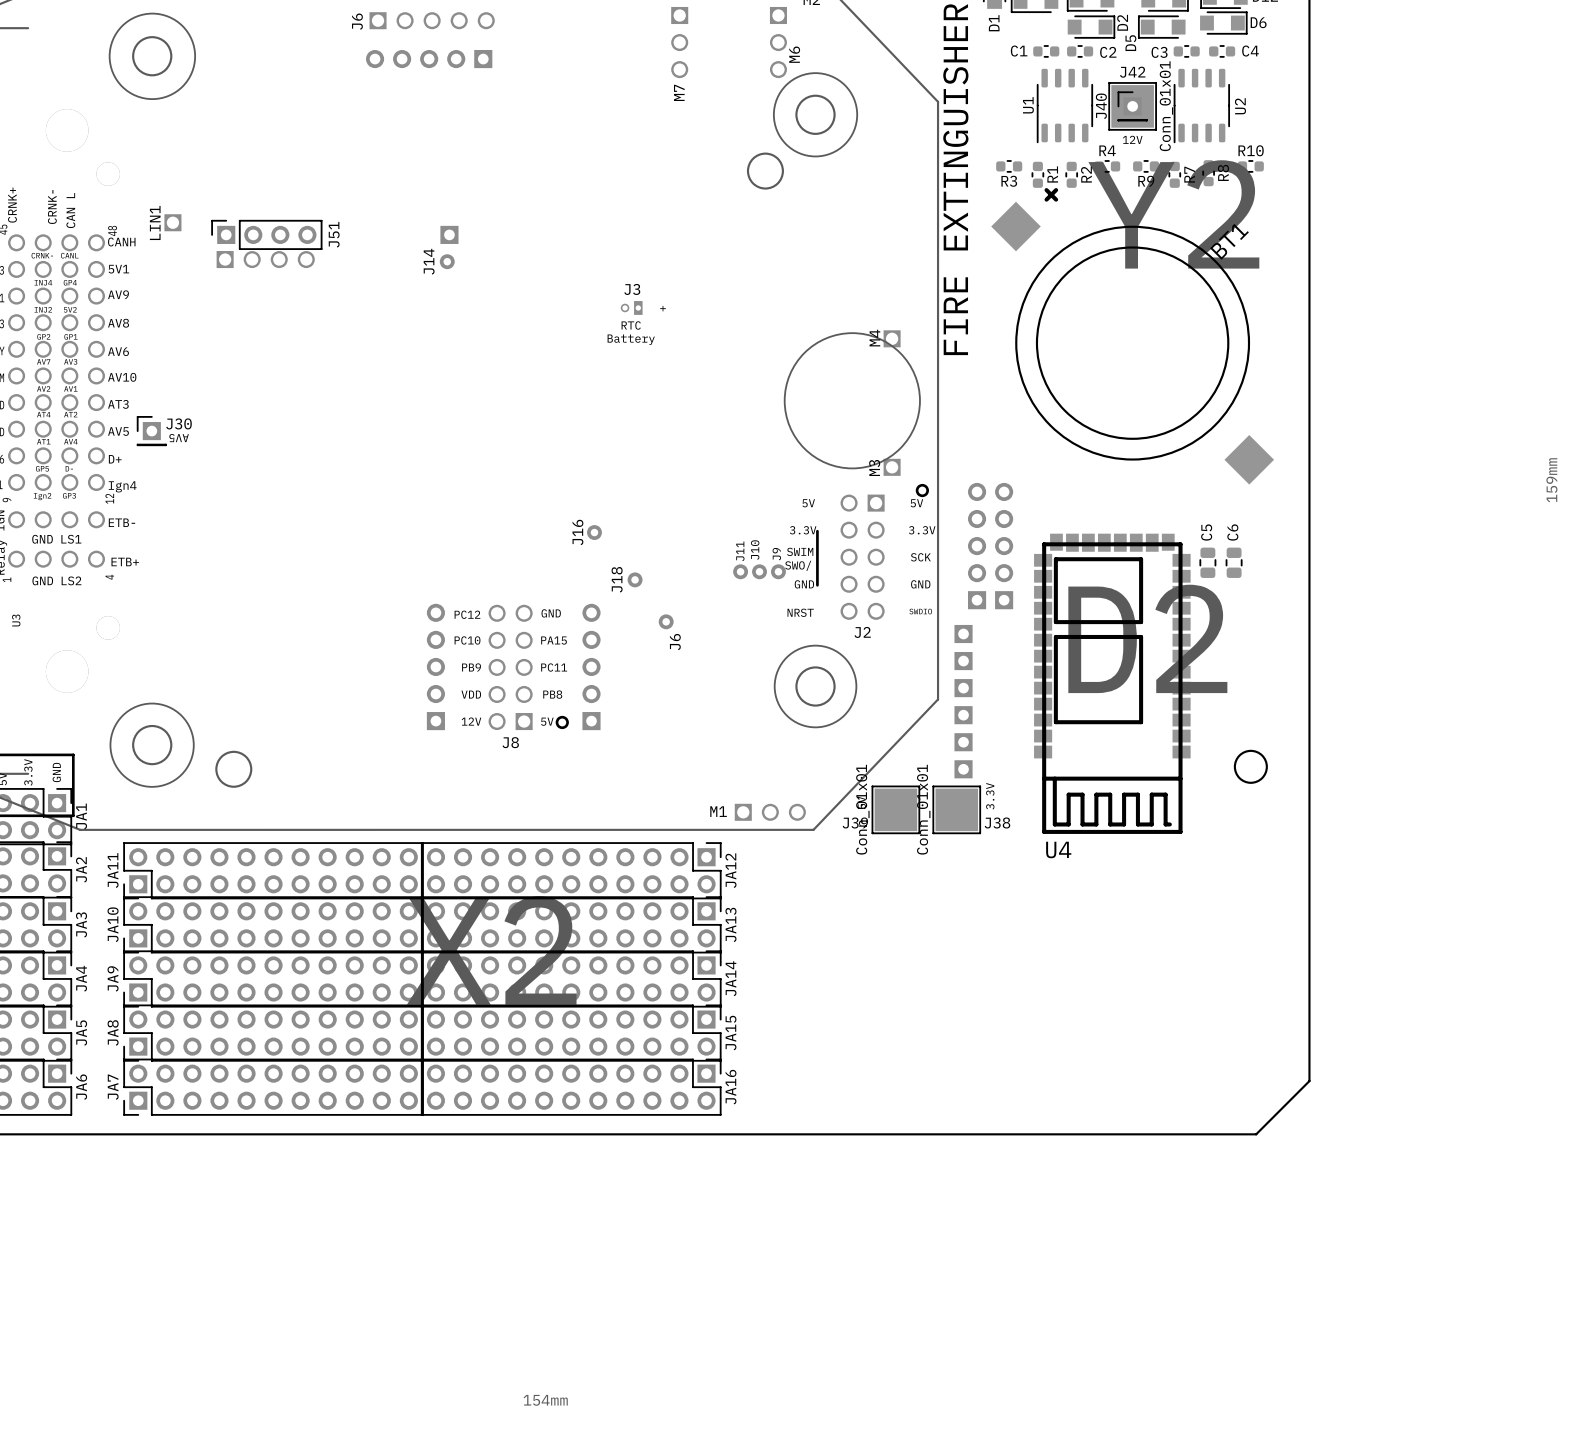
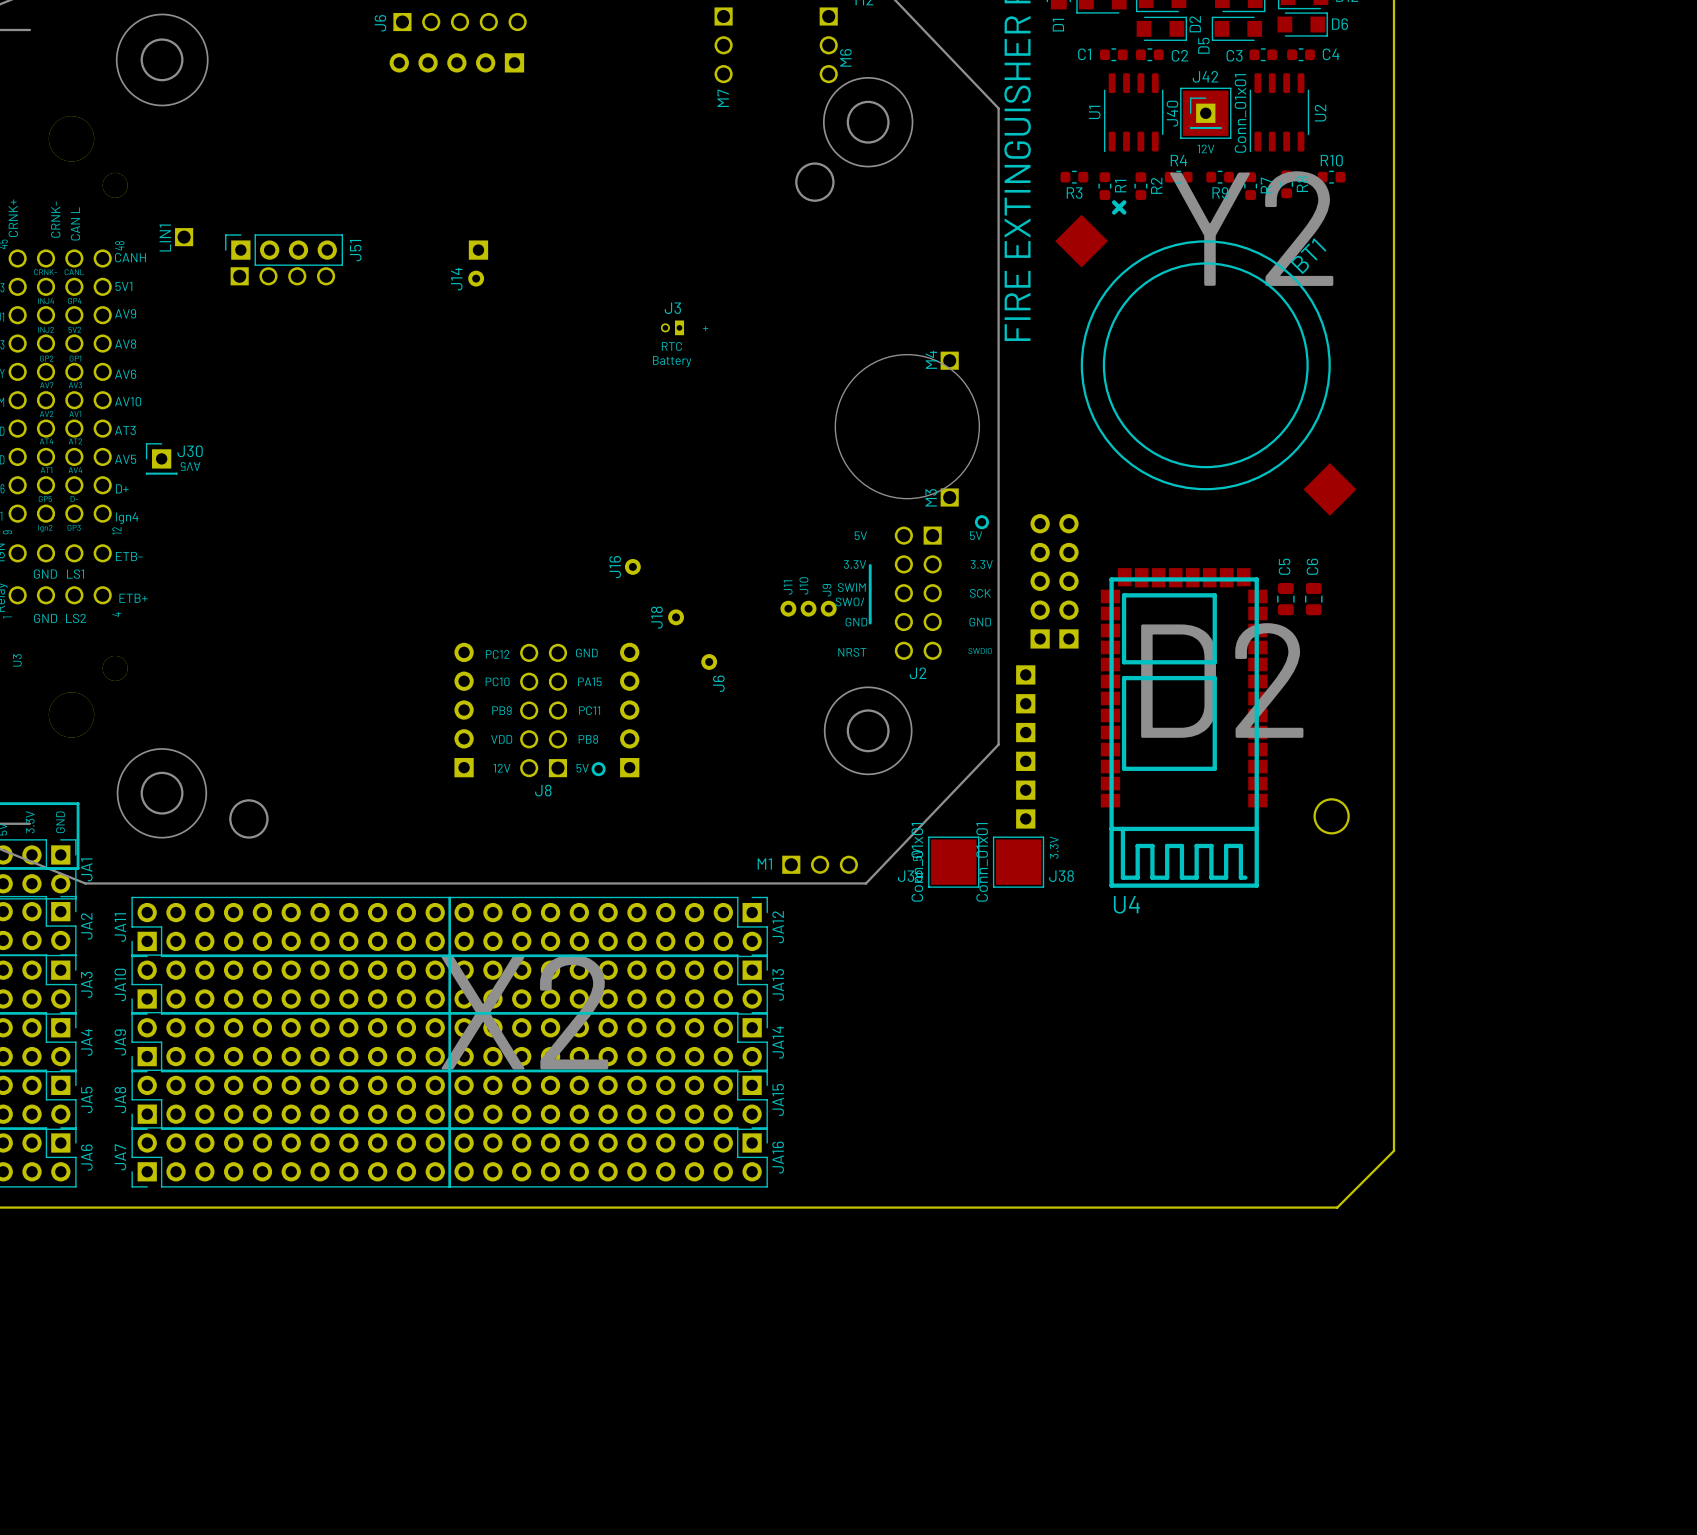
text: 159mm (1551, 480) -> none
text: 154mm (545, 1400) -> none

